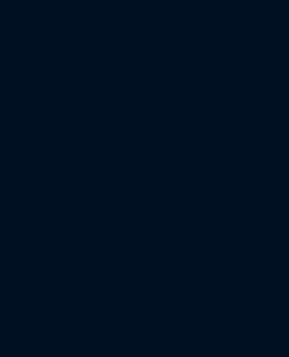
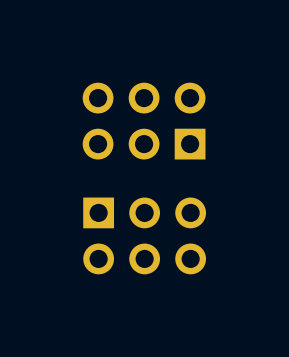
part: none -> (144, 121)
part: none -> (144, 235)

